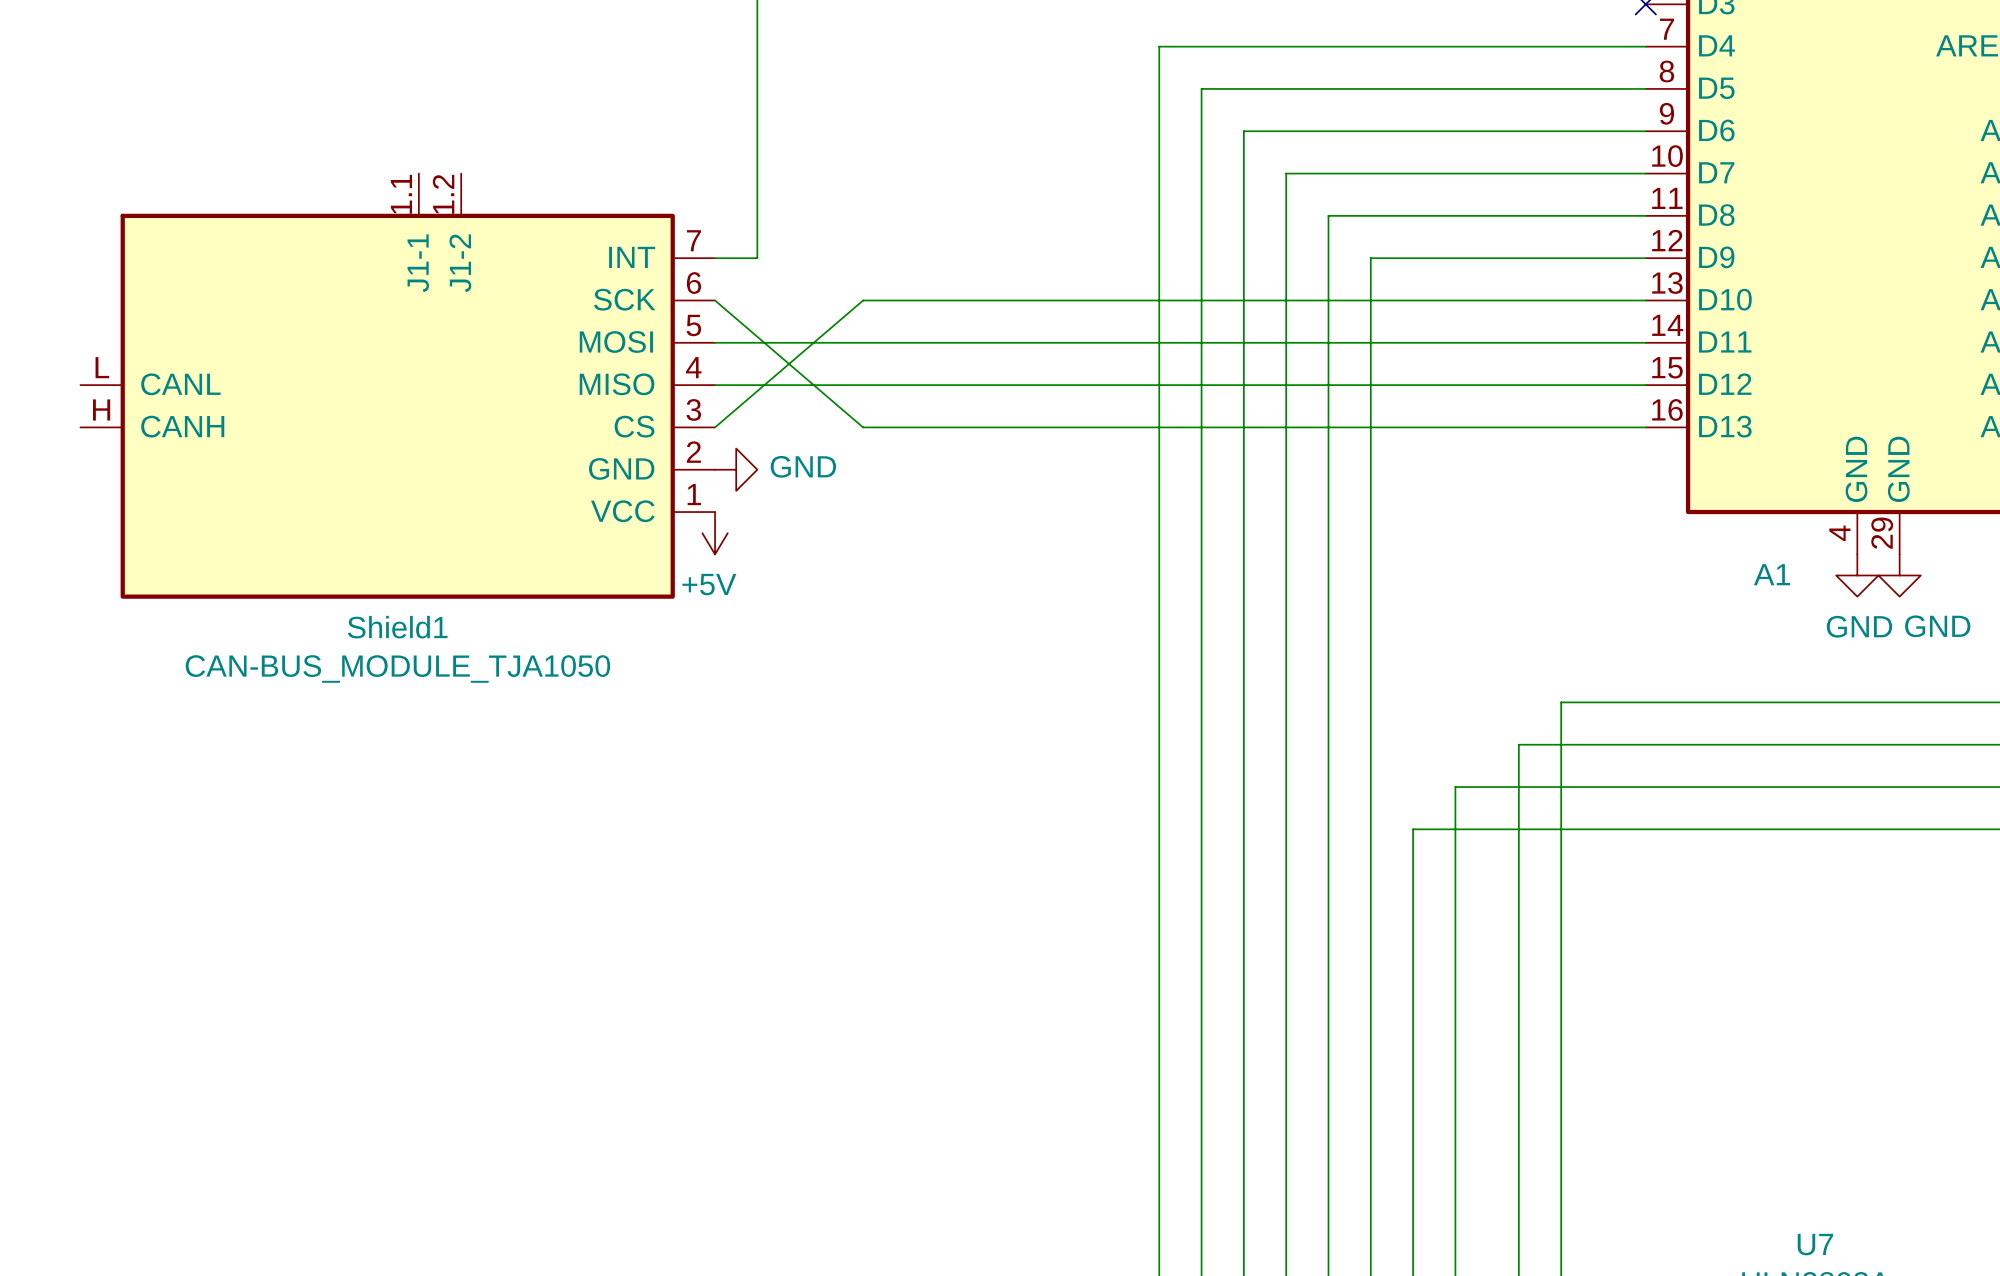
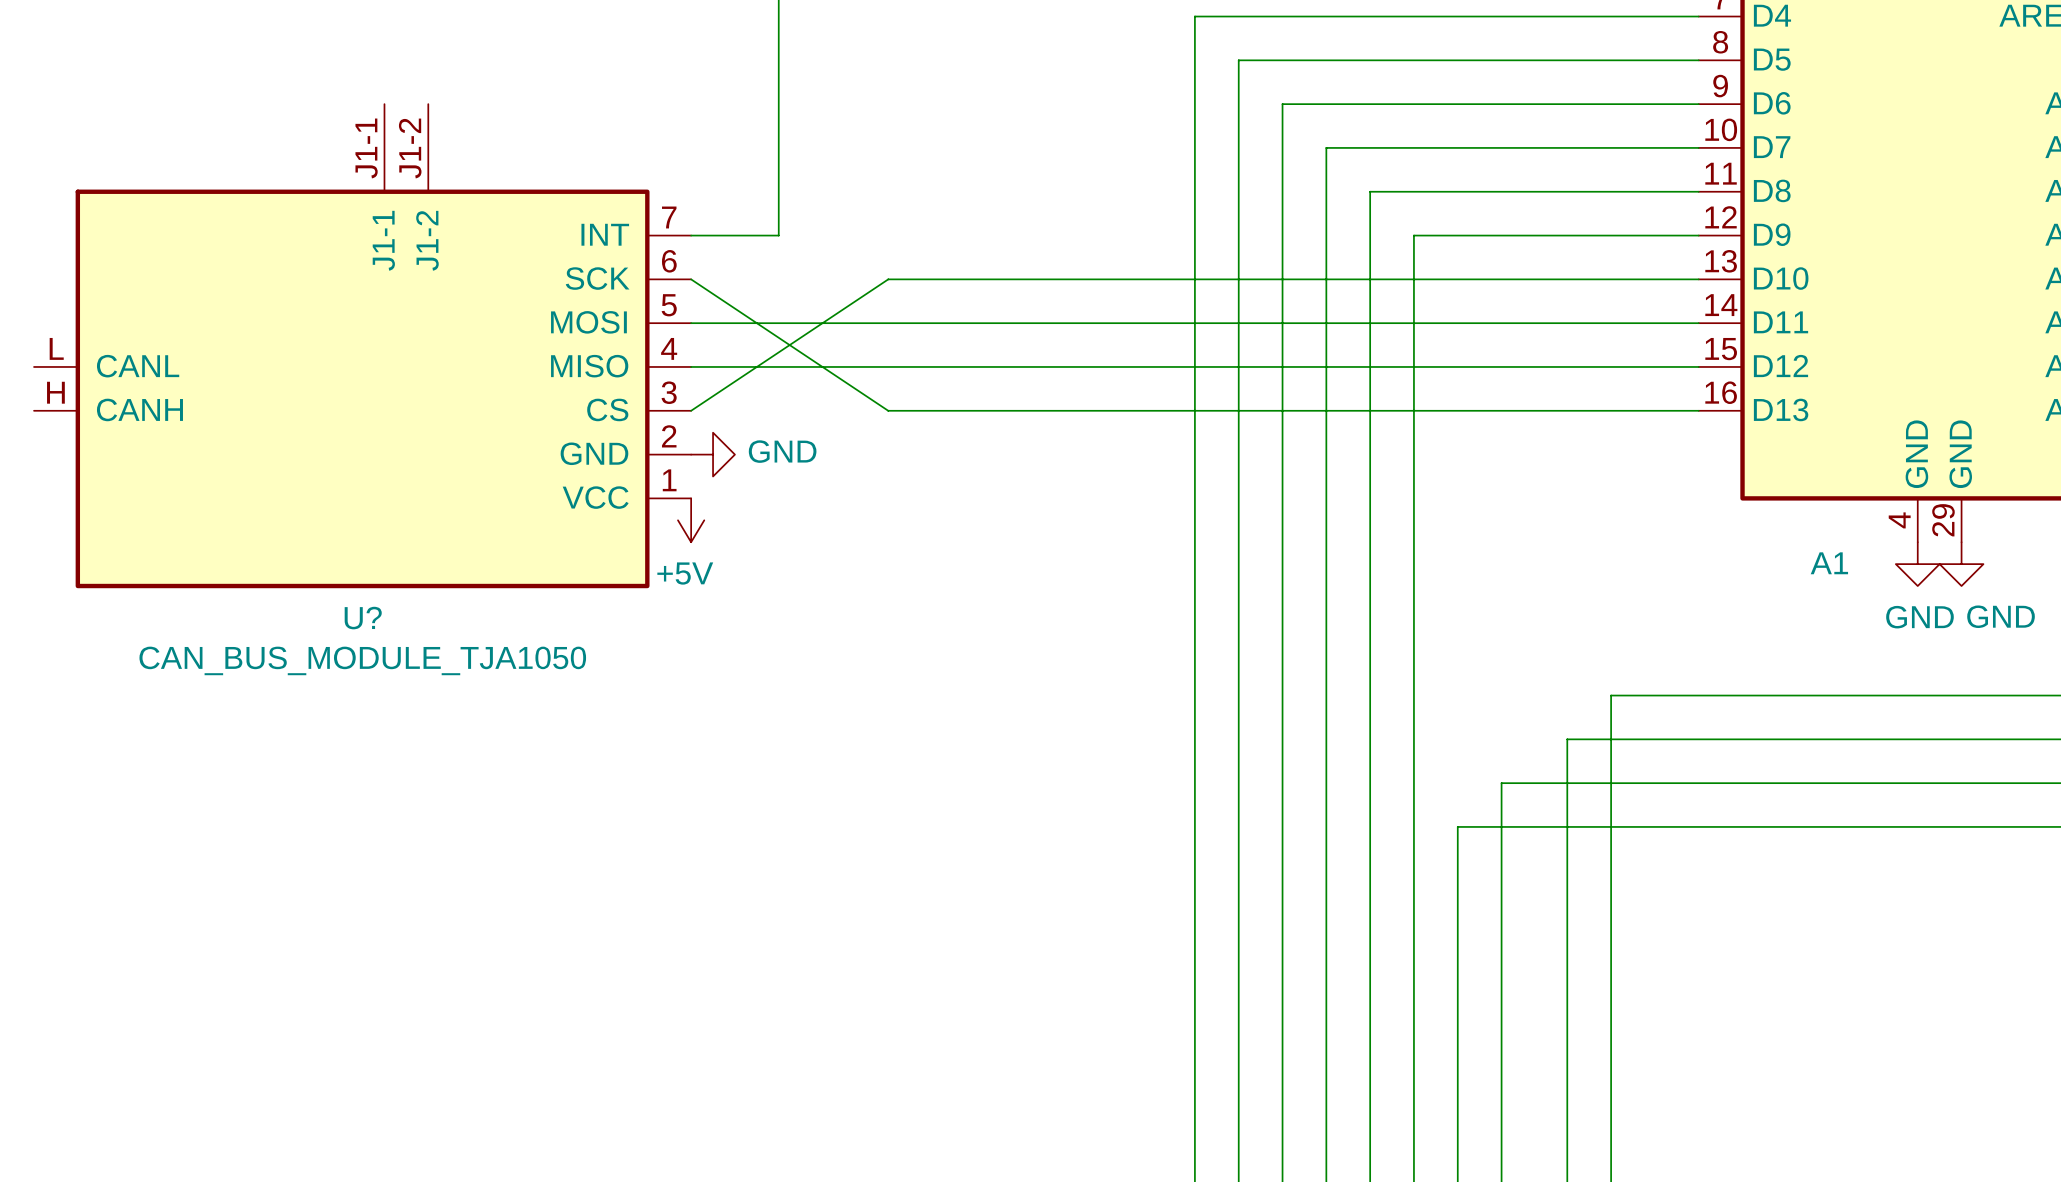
wire: (715, 300) (863, 427) -> (691, 279) (888, 410)
wire: (863, 300) (715, 427) -> (888, 279) (691, 410)
U?: none -> CAN_BUS_MODULE_TJA1050 (362, 346)
Shield1: CAN-BUS_MODULE_TJA1050 (397, 386) -> none
power symbol position: GND (736, 469) -> GND (713, 454)
power symbol position: +5V (715, 533) -> +5V (691, 520)

